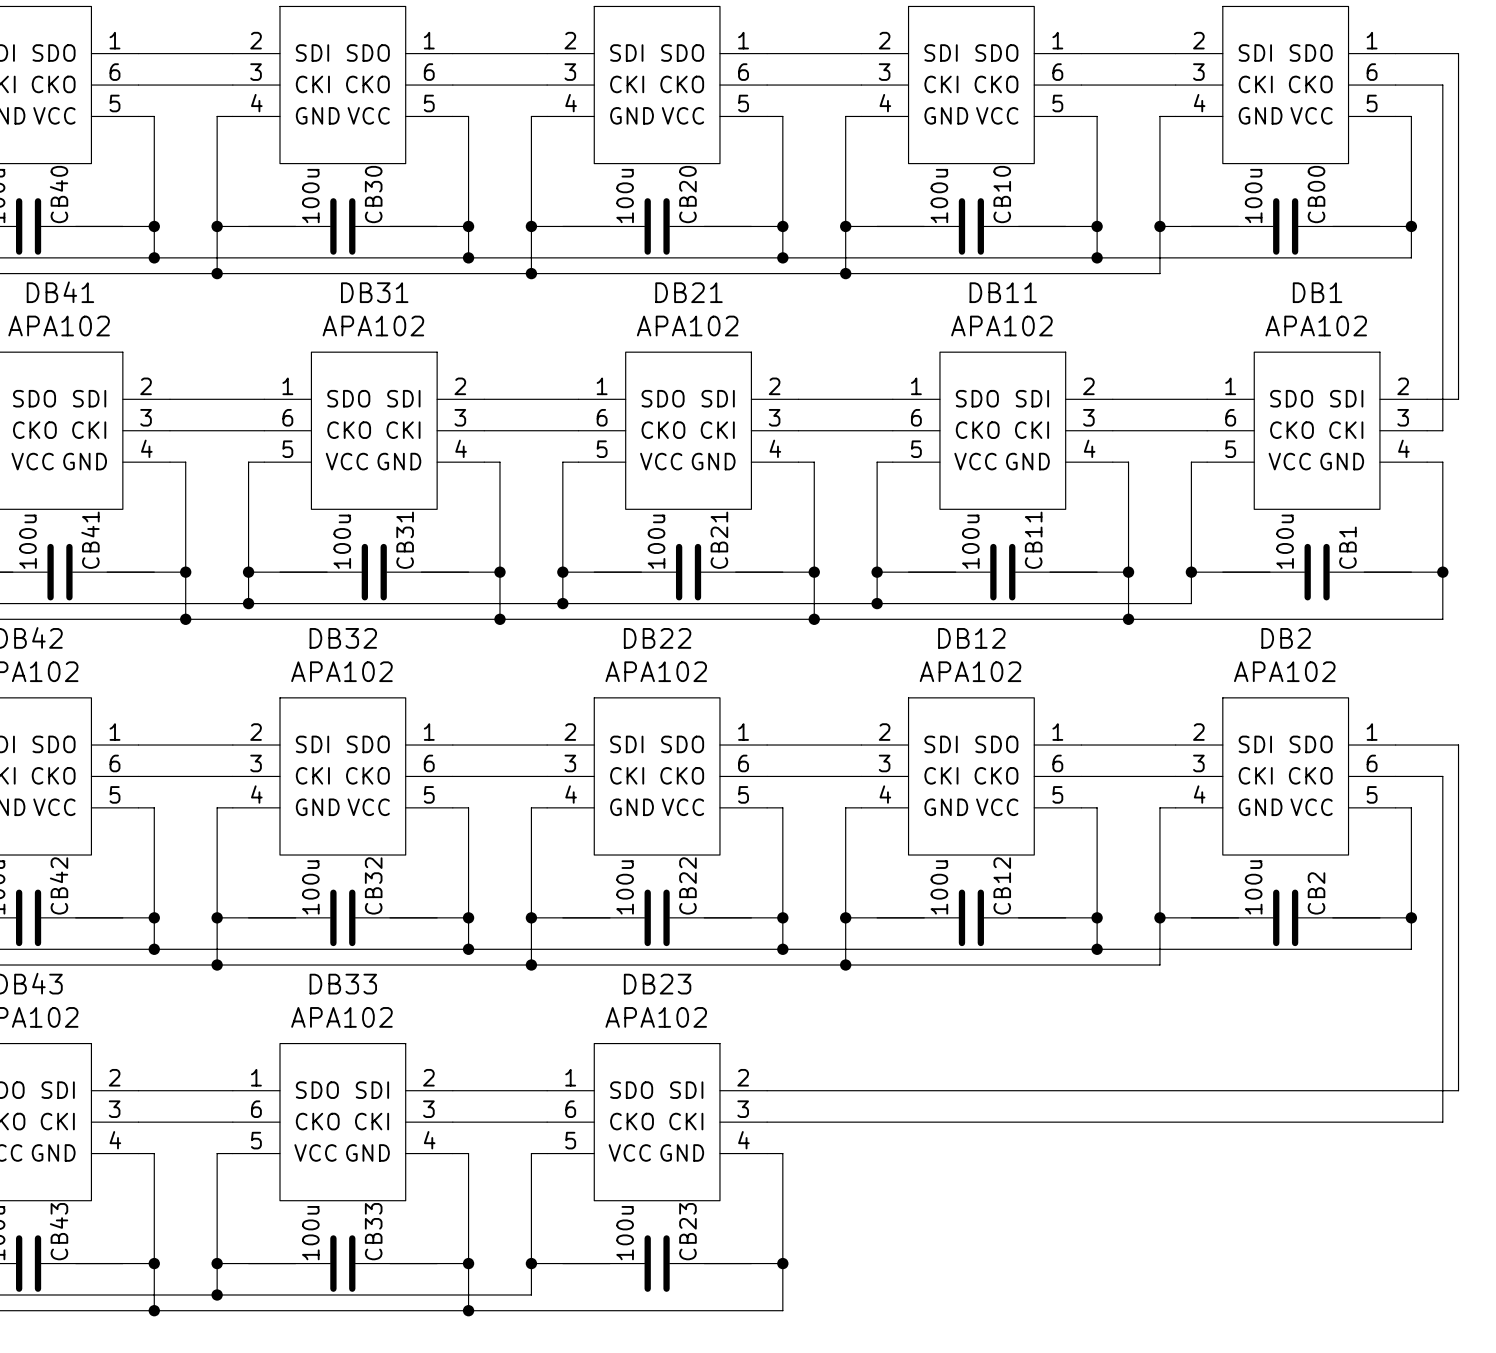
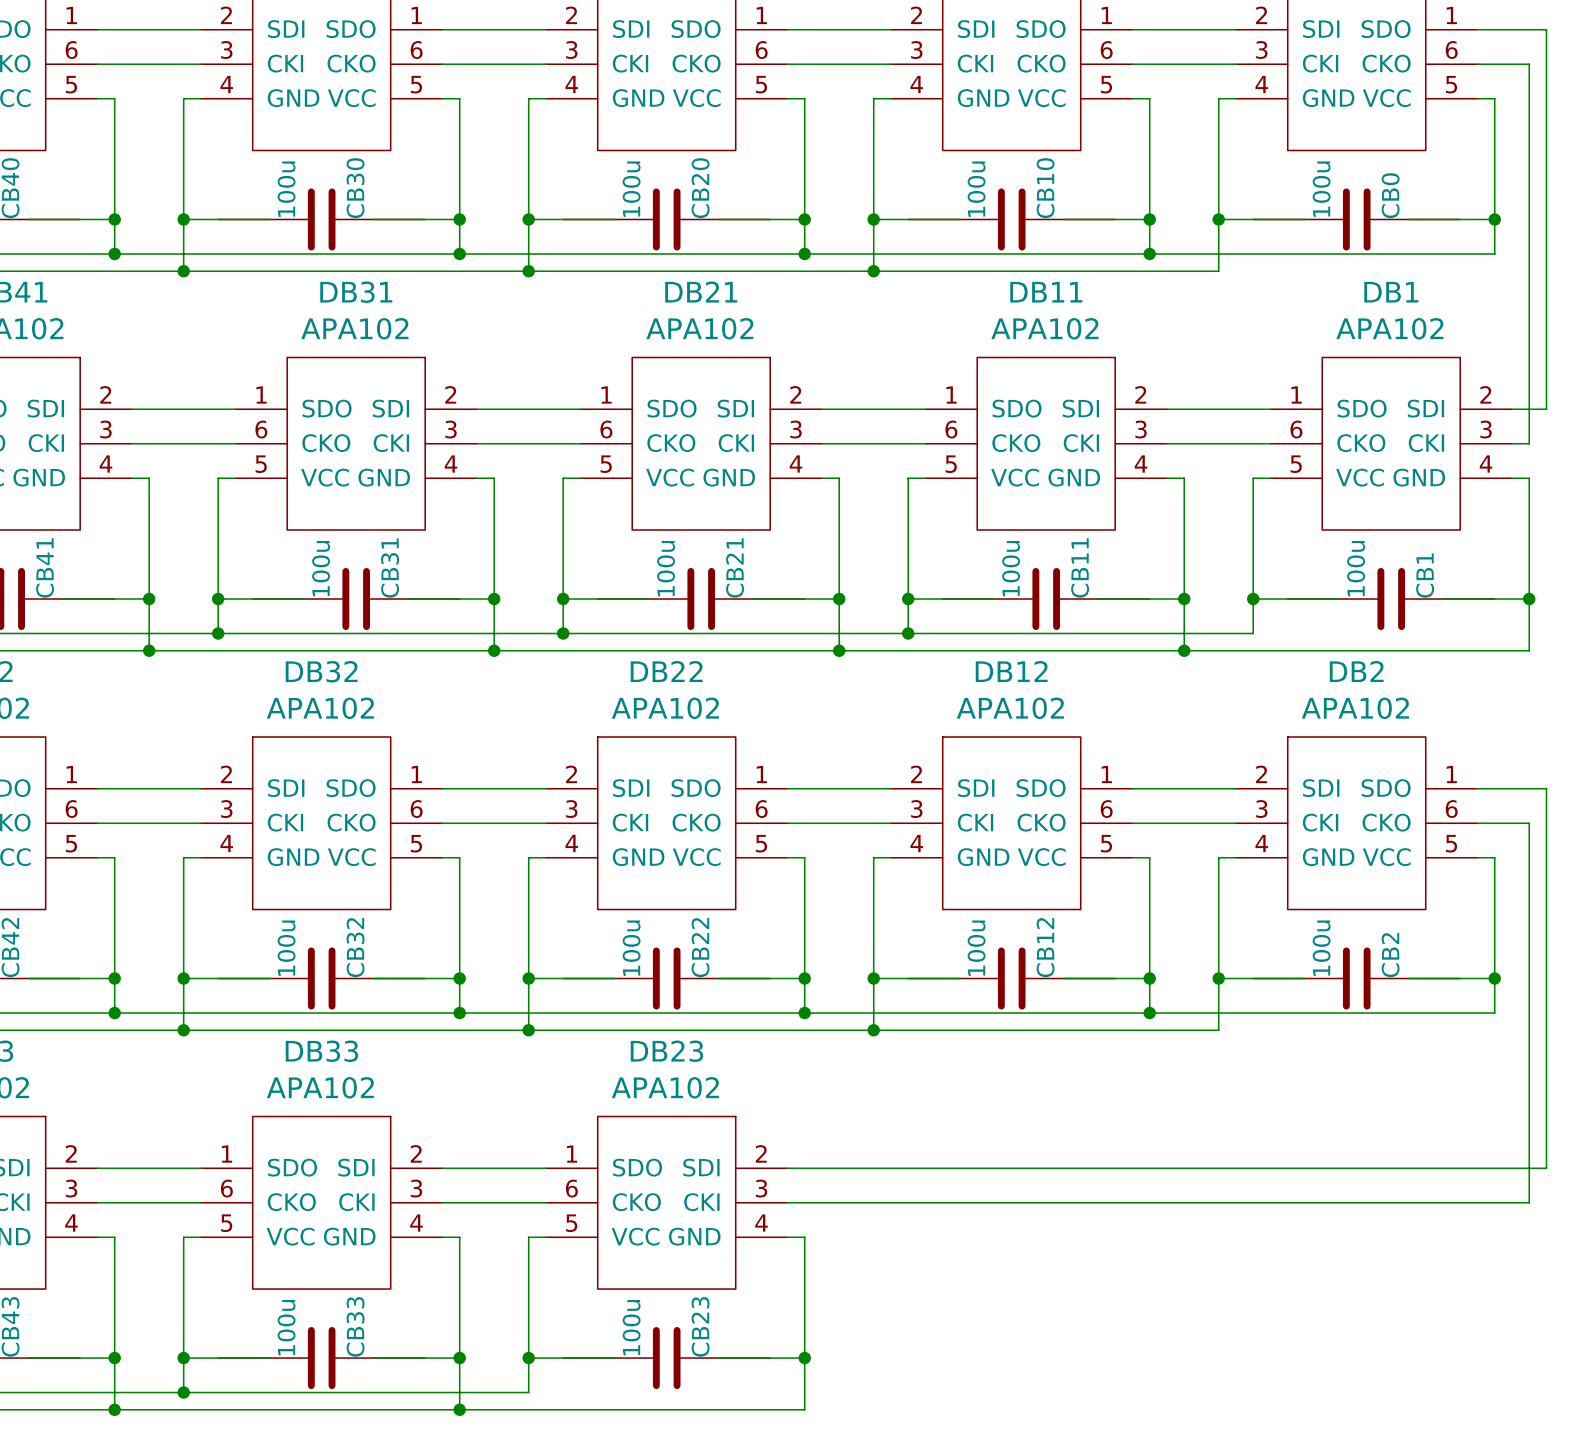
CB00 name: CB00 (1316, 194) -> CB0 (1390, 195)

